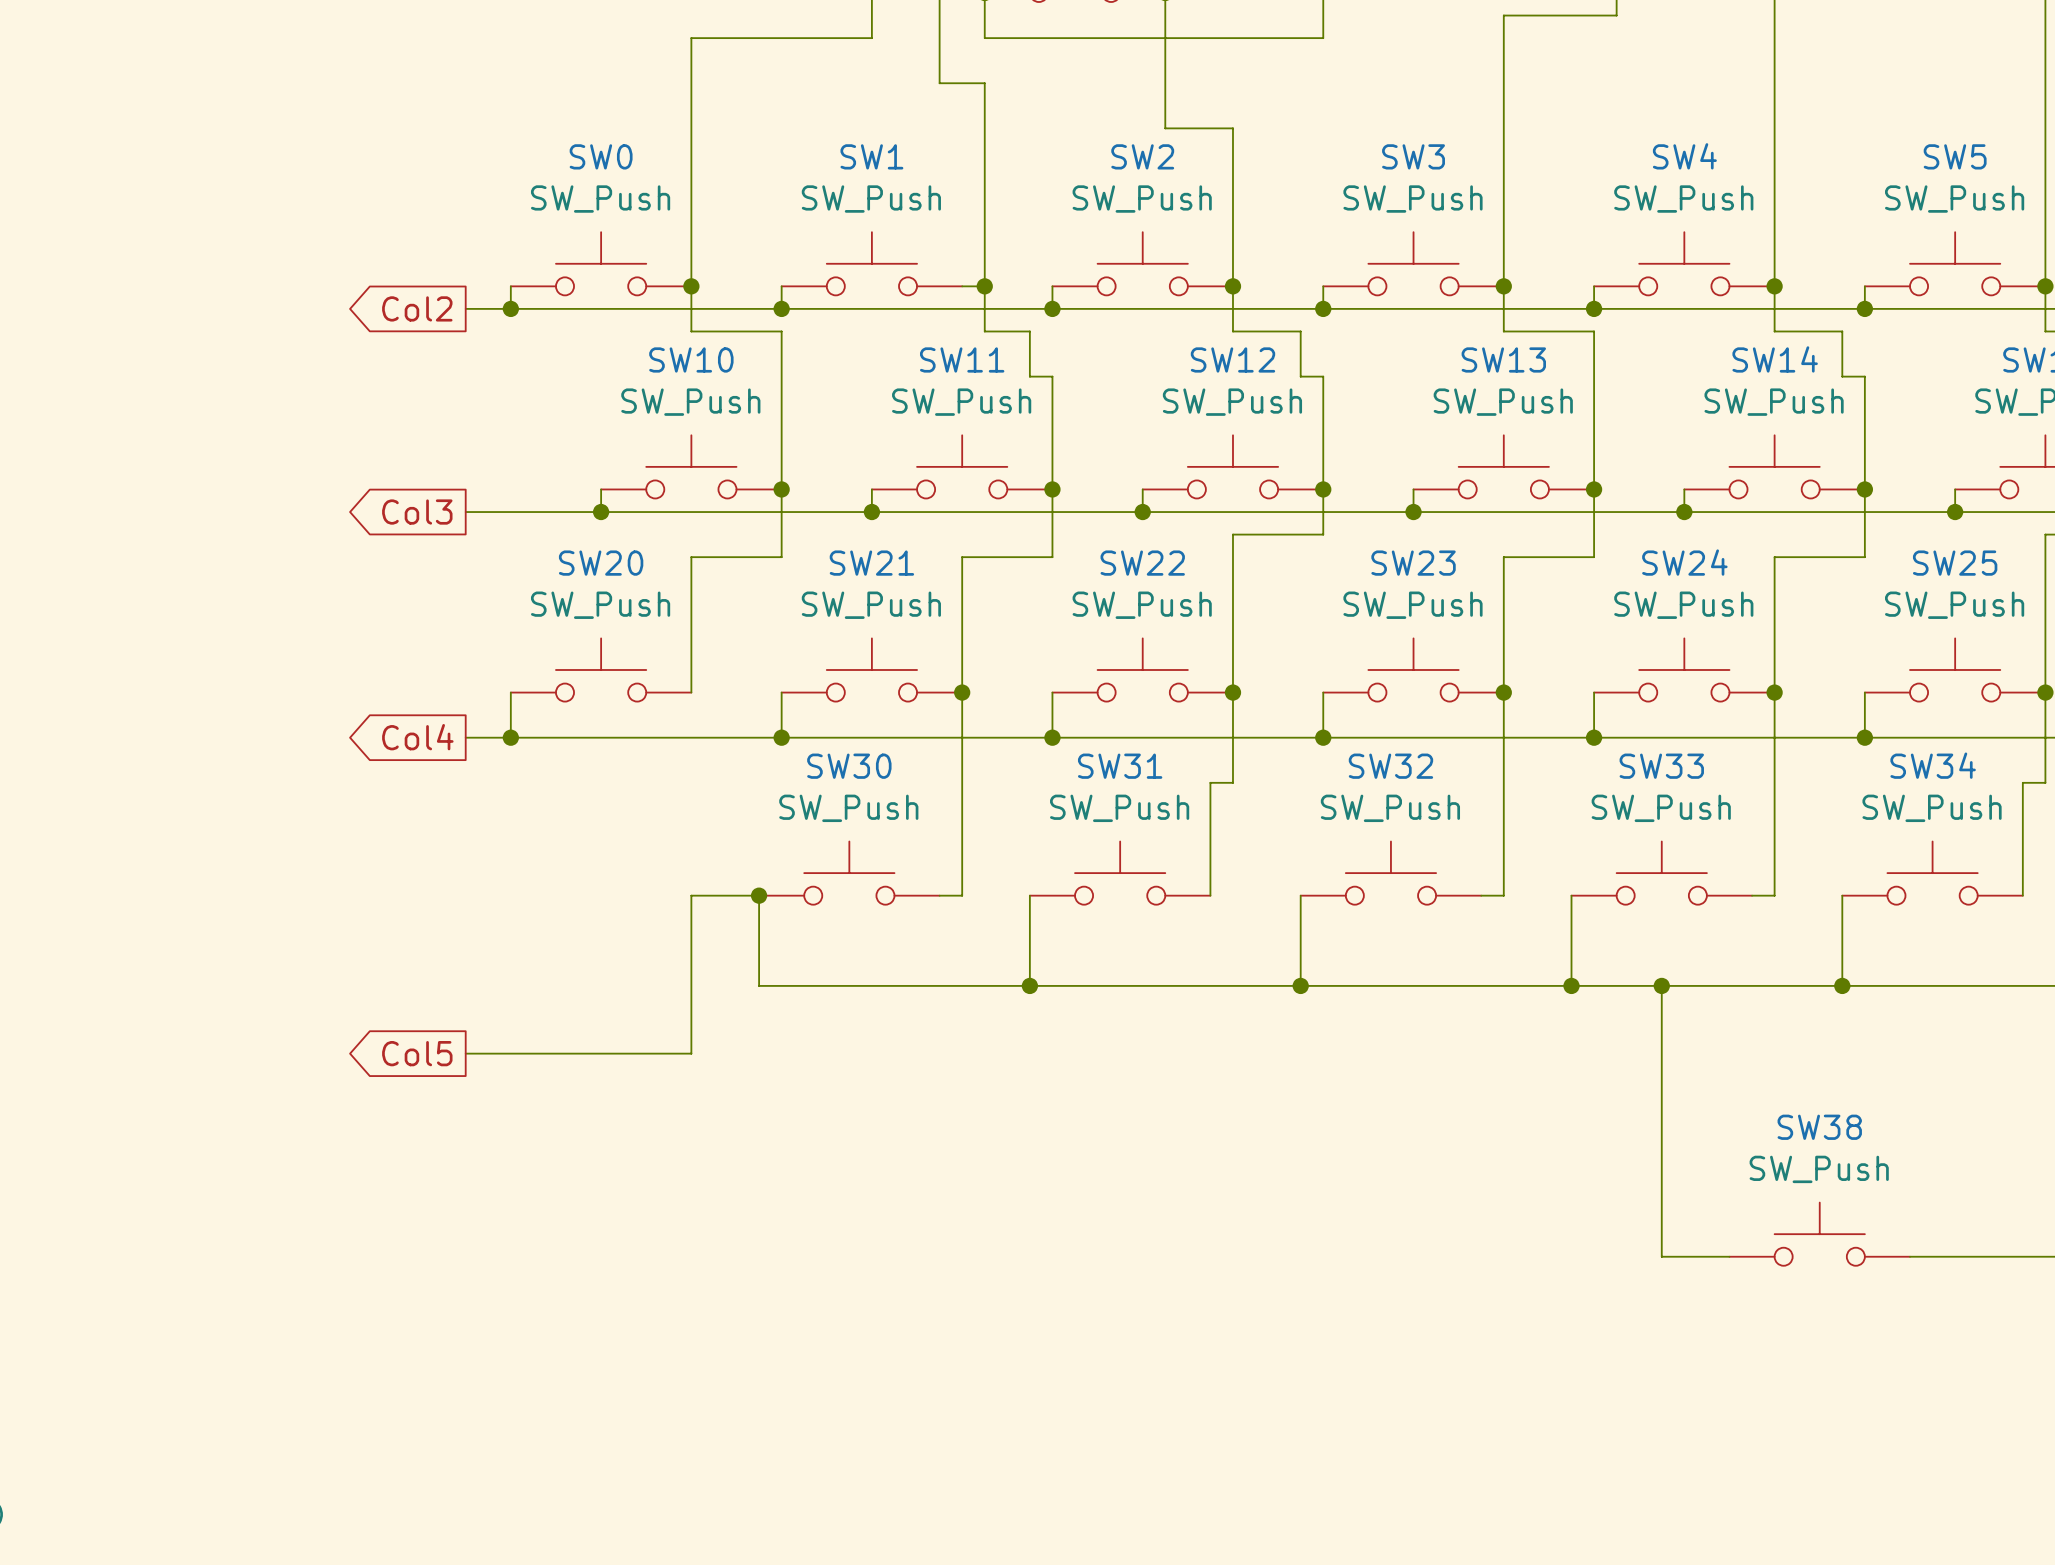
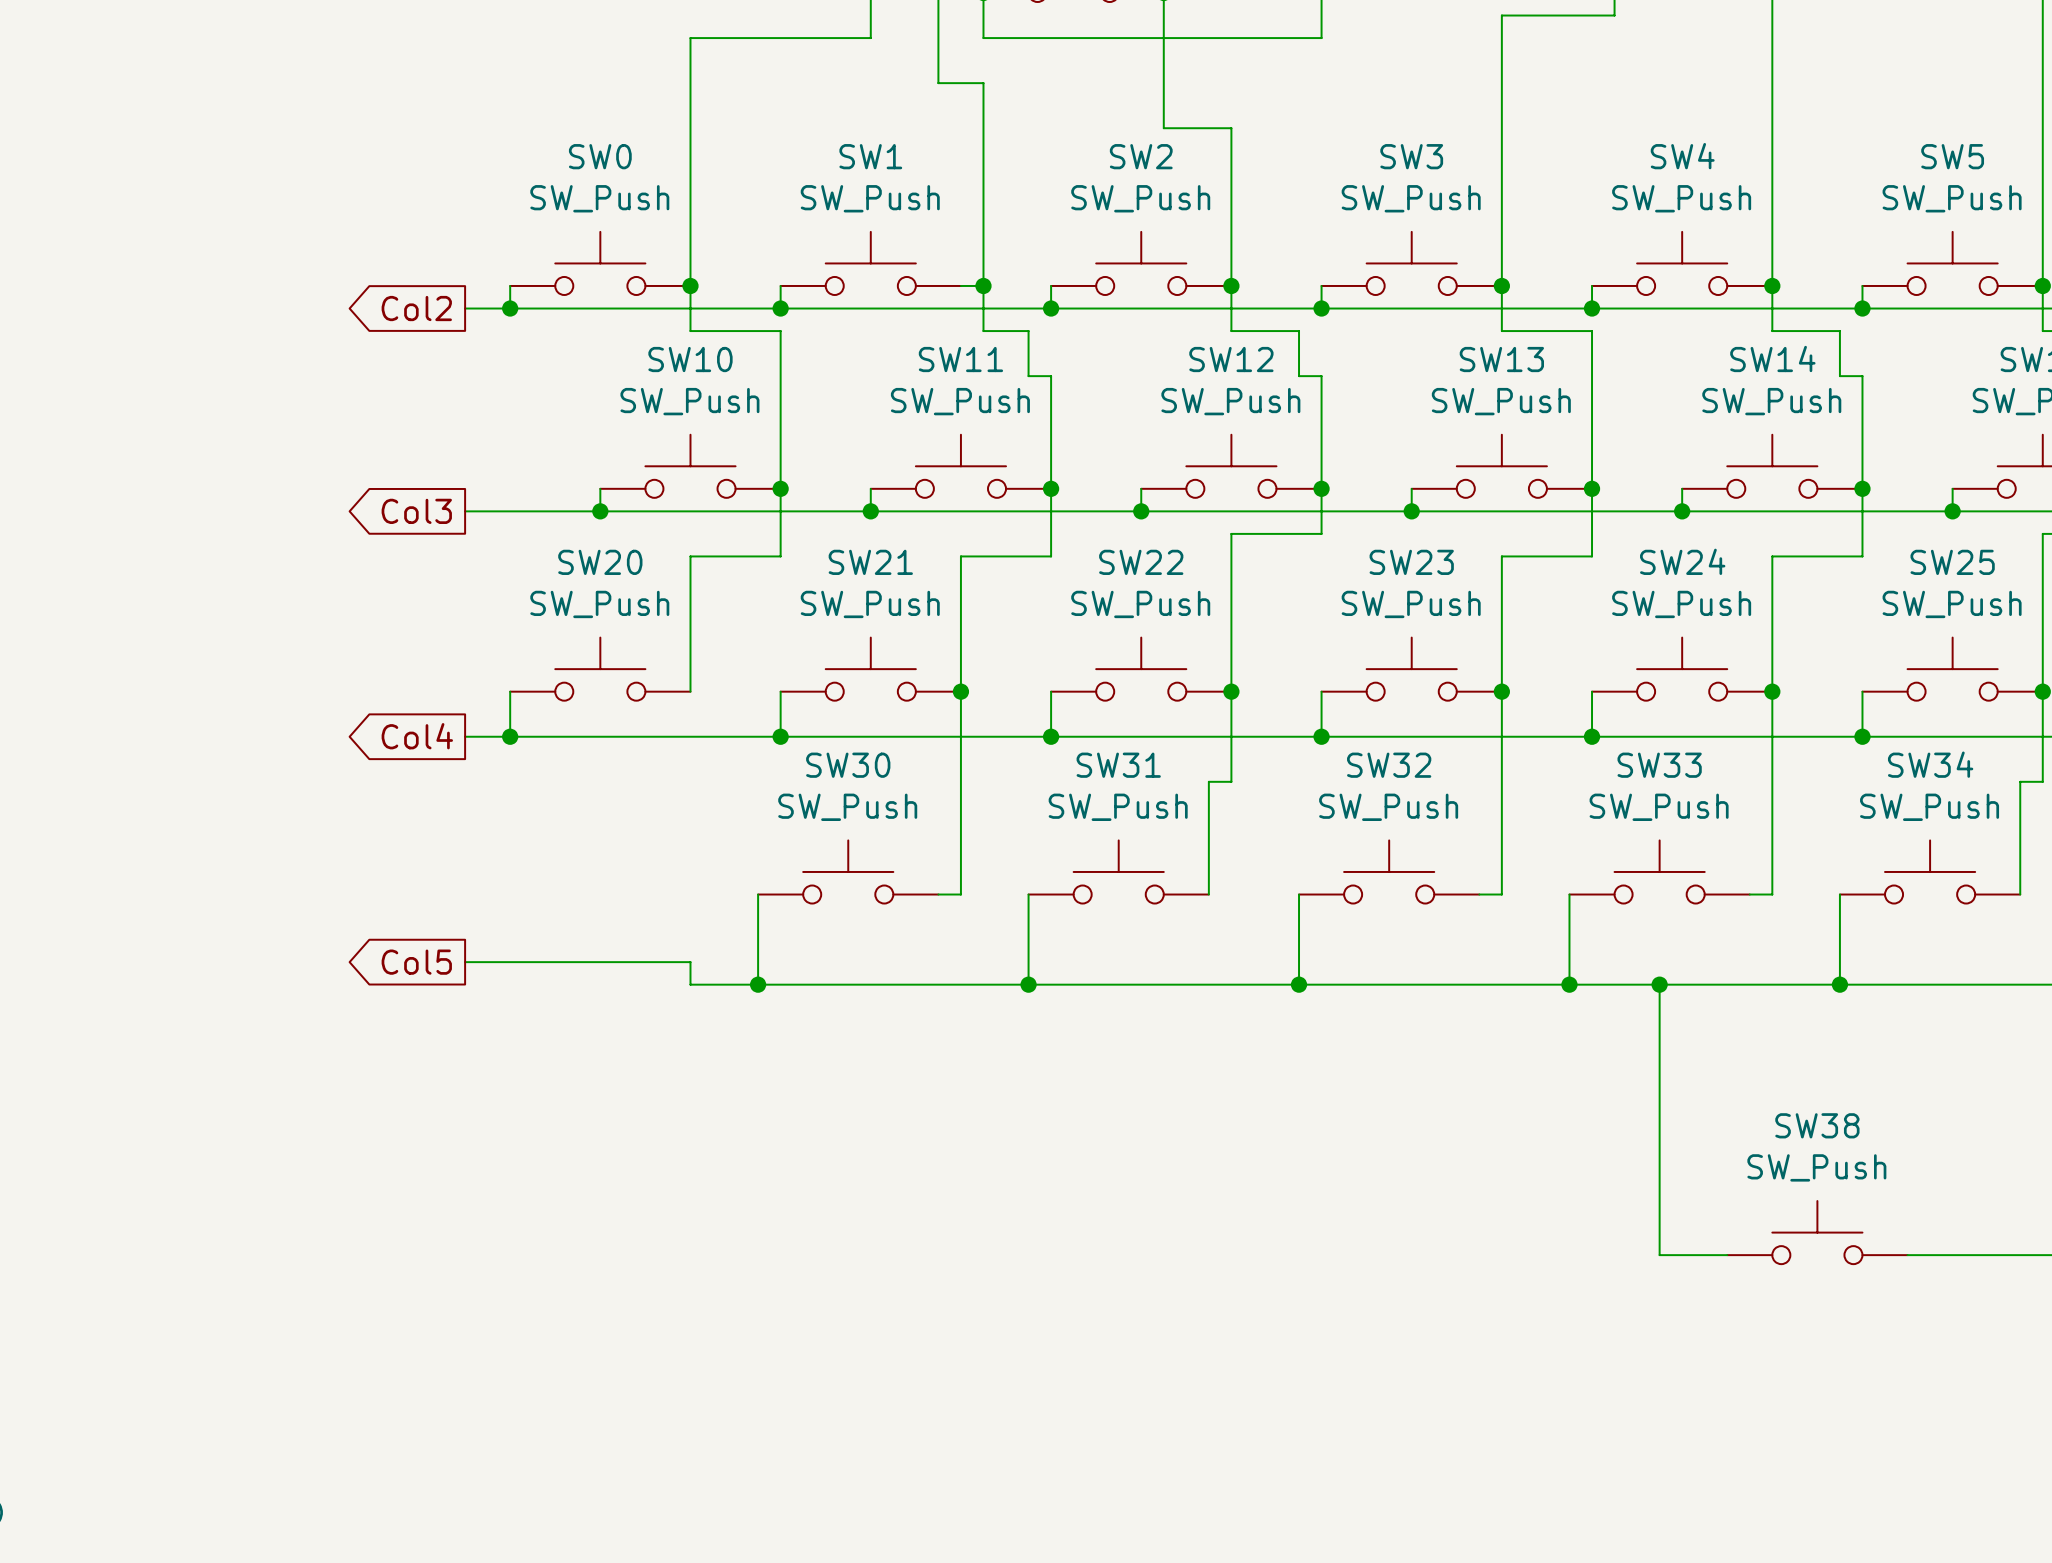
wire: (759, 895) (691, 895) (691, 963) -> (465, 962) (690, 962)
junction position: (759, 895) -> (758, 984)
wire: (691, 985) (691, 1053) (465, 1053) -> (690, 984) (758, 984)
global label position: Col5 (417, 1053) -> Col5 (416, 962)

